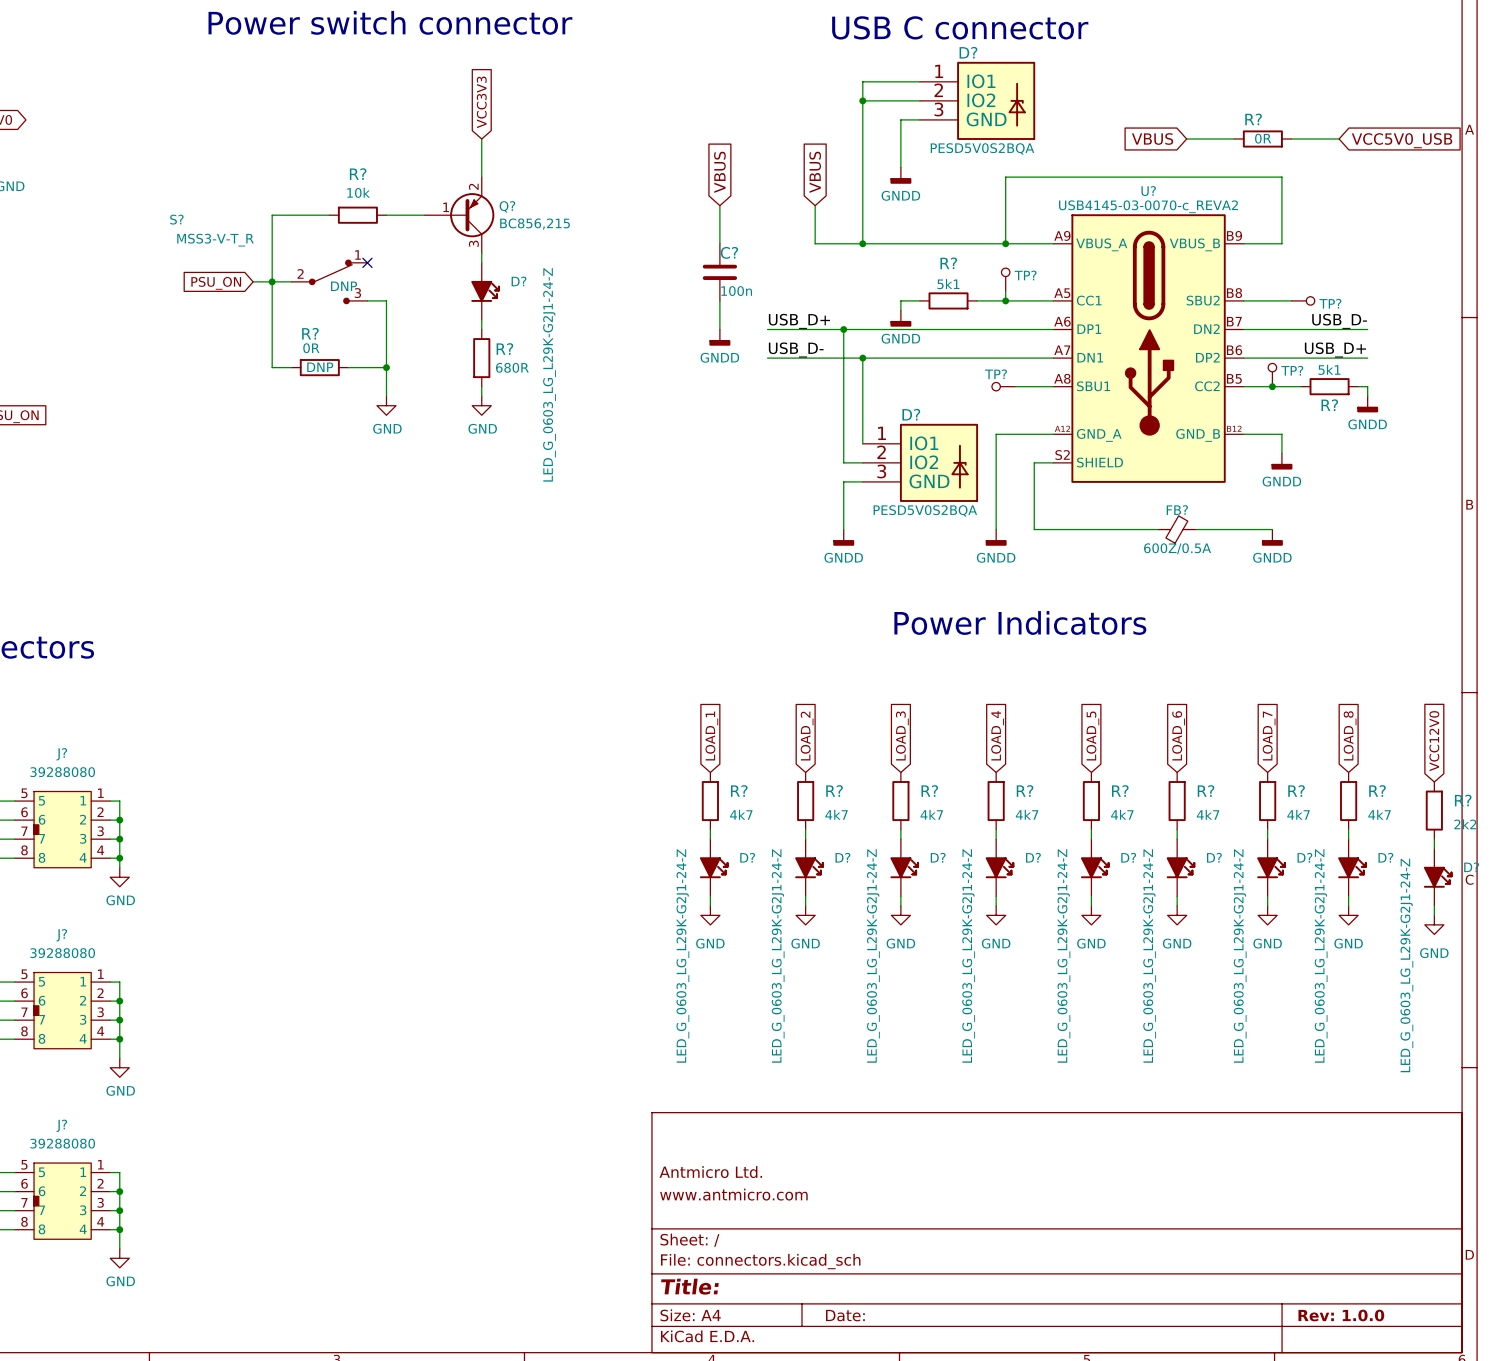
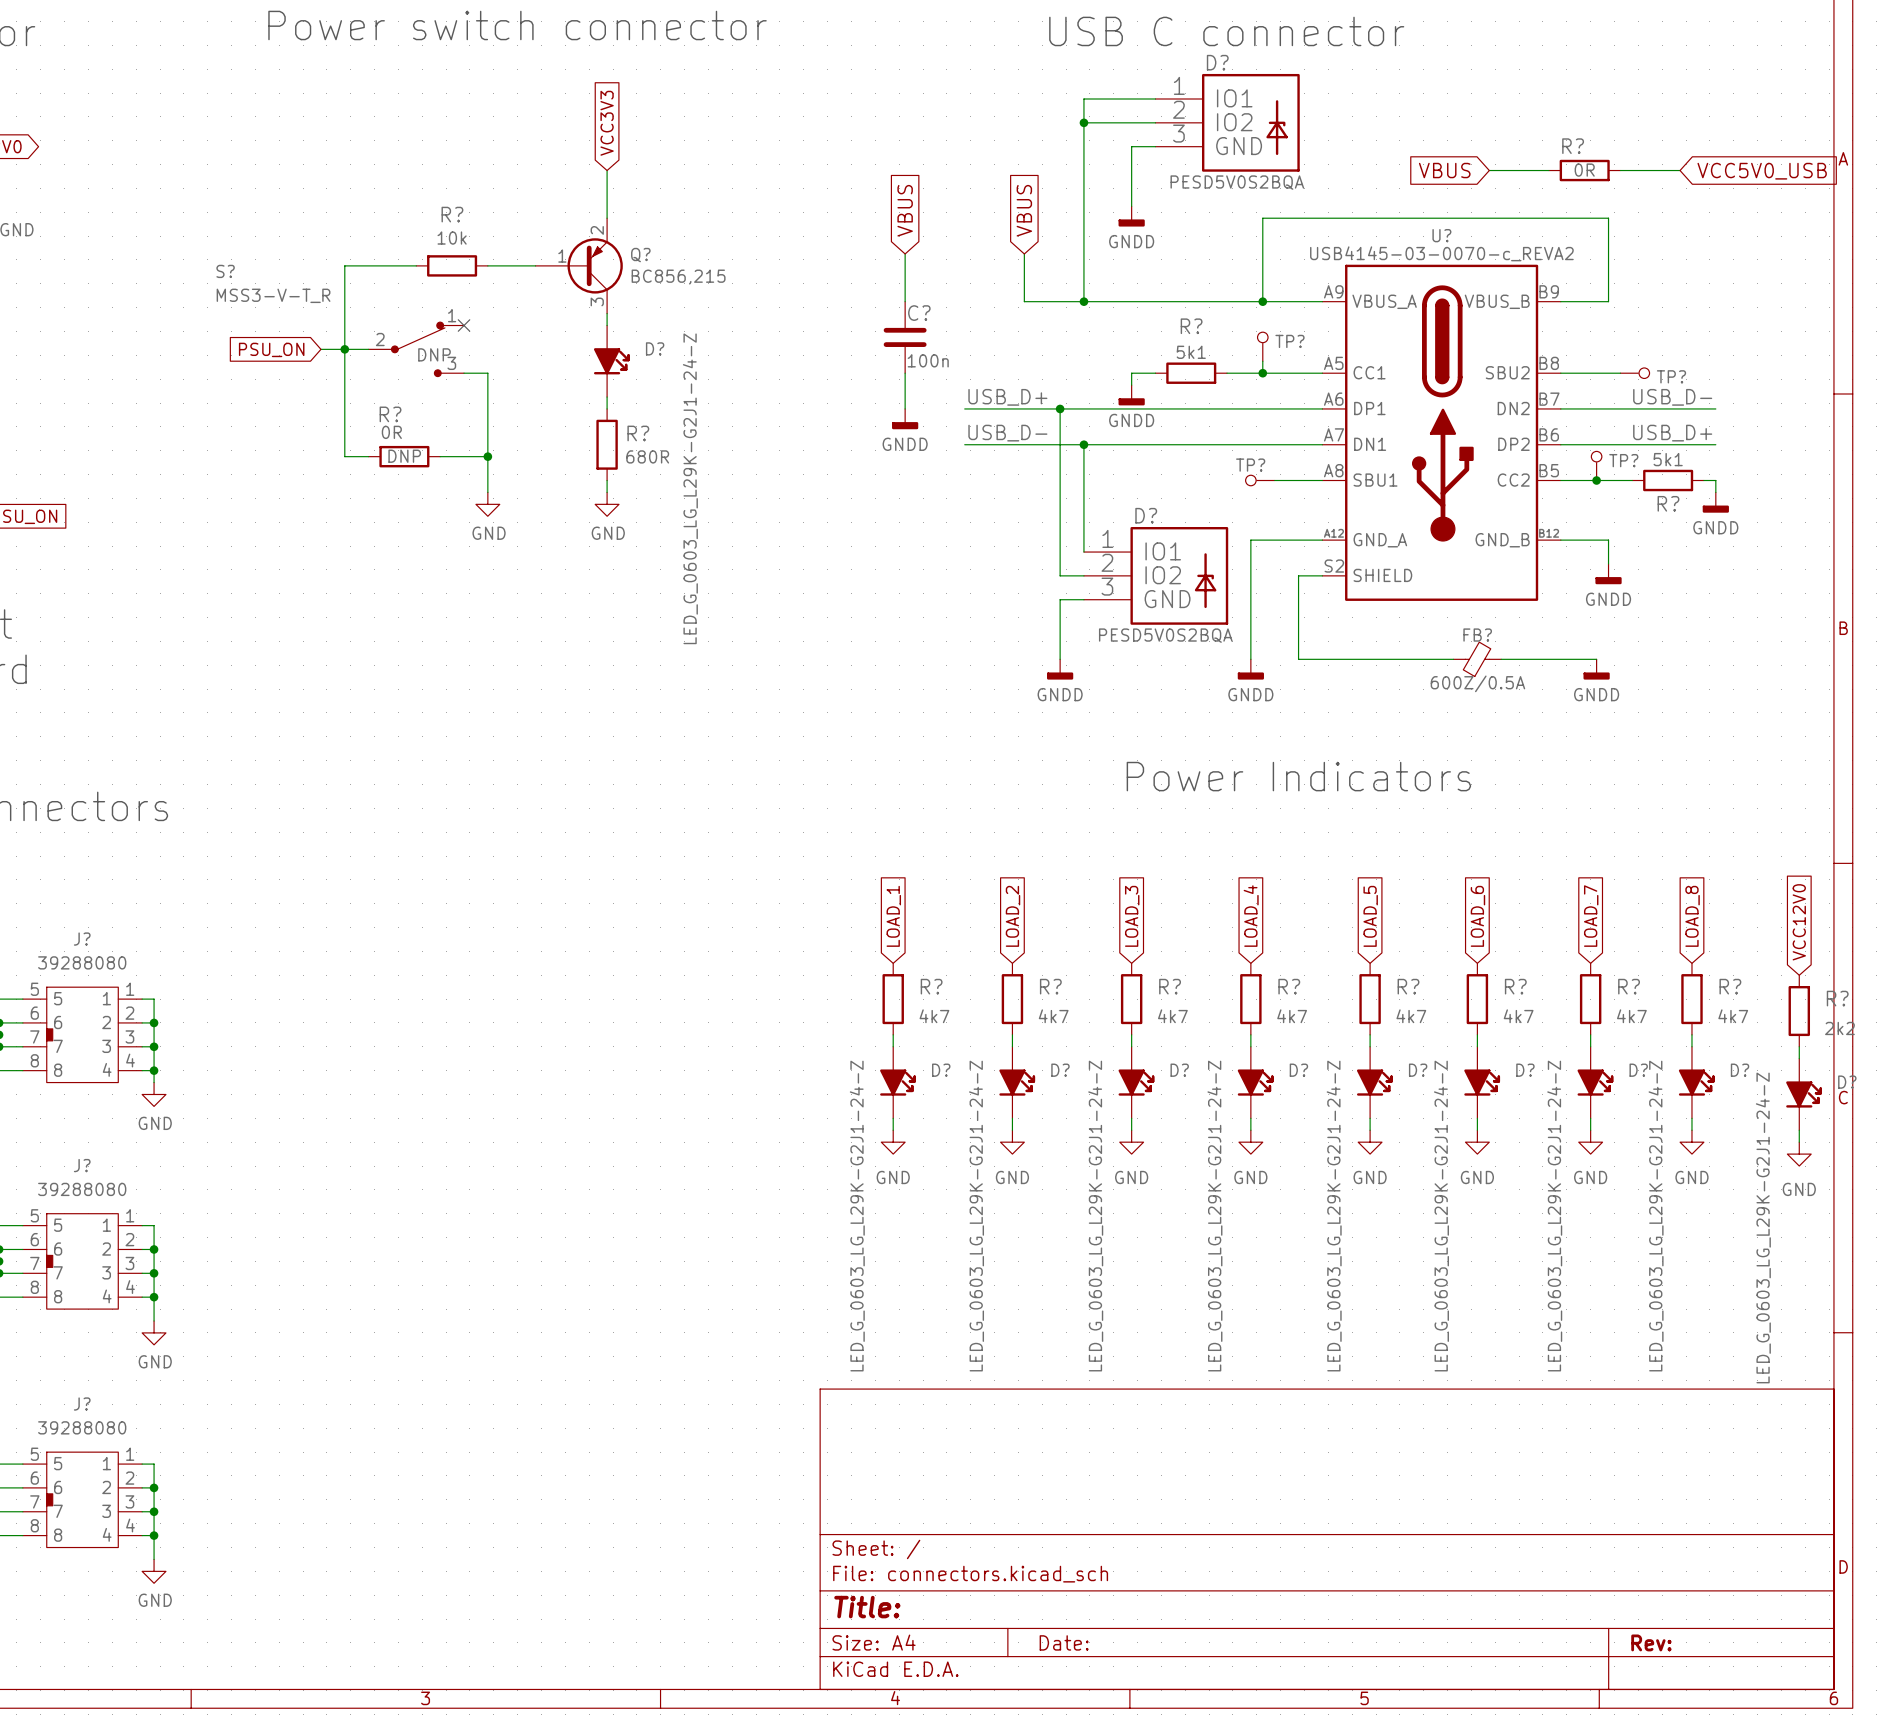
title block: Antmicro Ltd. (710, 1172) -> none
title block: www.antmicro.com (733, 1194) -> none
title block: Rev: 1.0.0 (1341, 1315) -> Rev: (1651, 1642)

